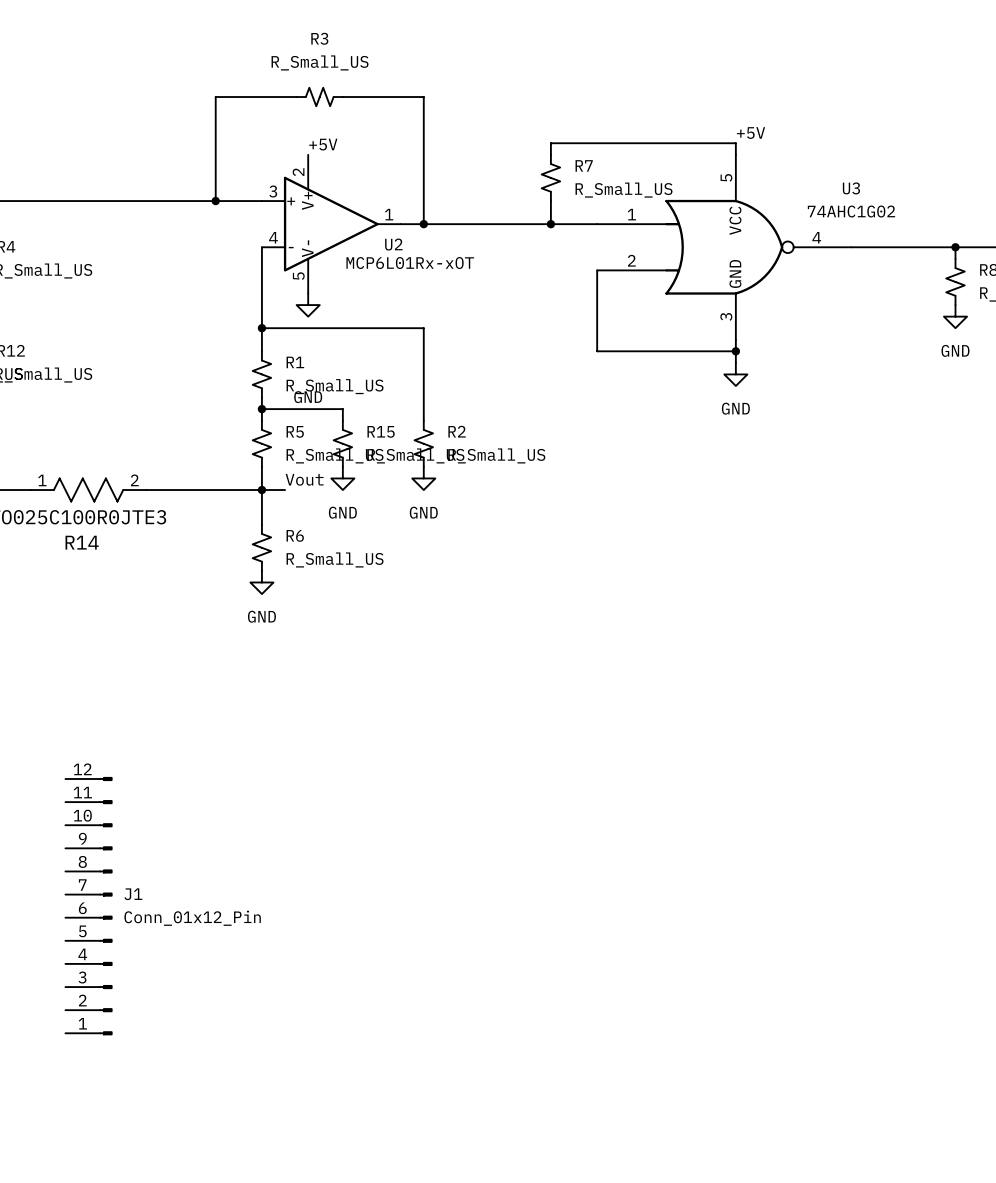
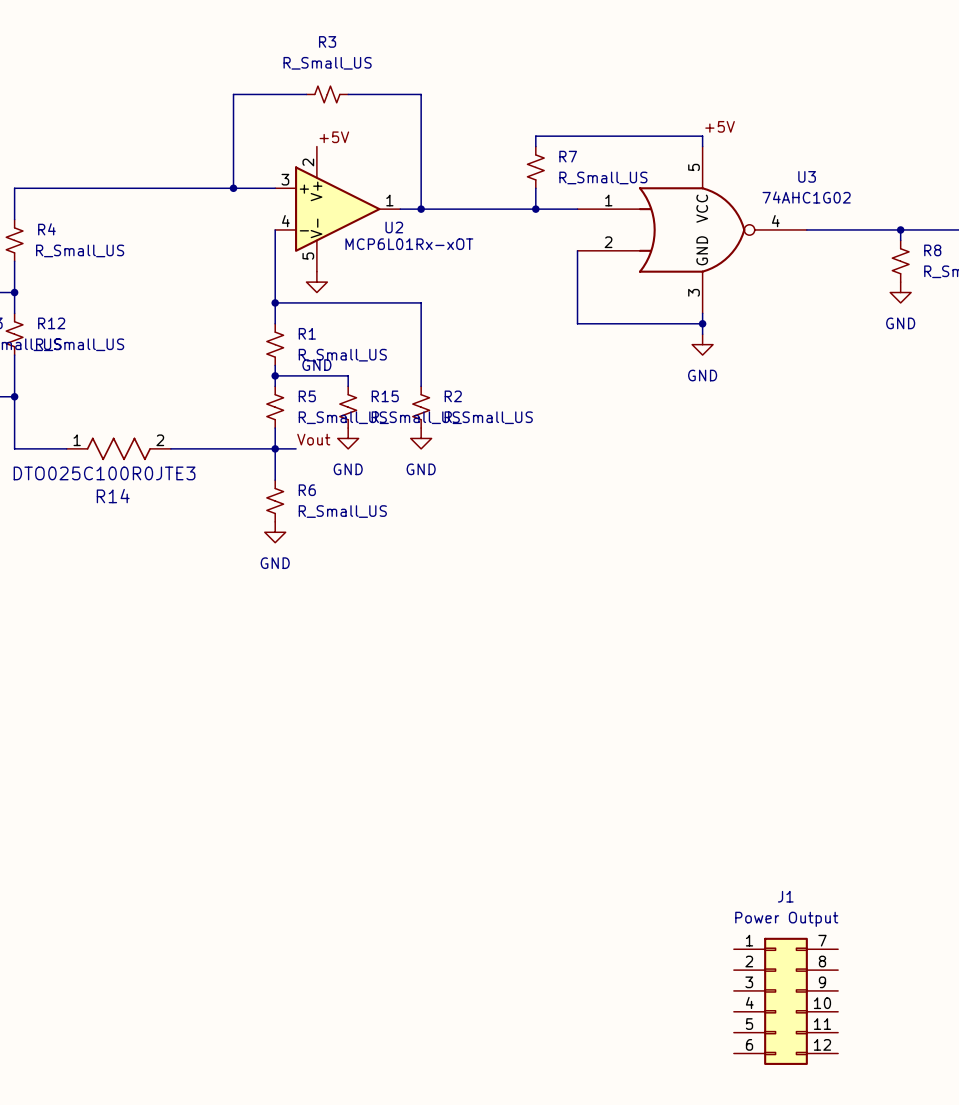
J1 symbol: [65, 777, 113, 1036] -> [733, 937, 839, 1065]
J1 name position: J1 (133, 894) -> J1 (785, 896)
J1 value: Conn_01x12_Pin (192, 918) -> Power Output (786, 919)

